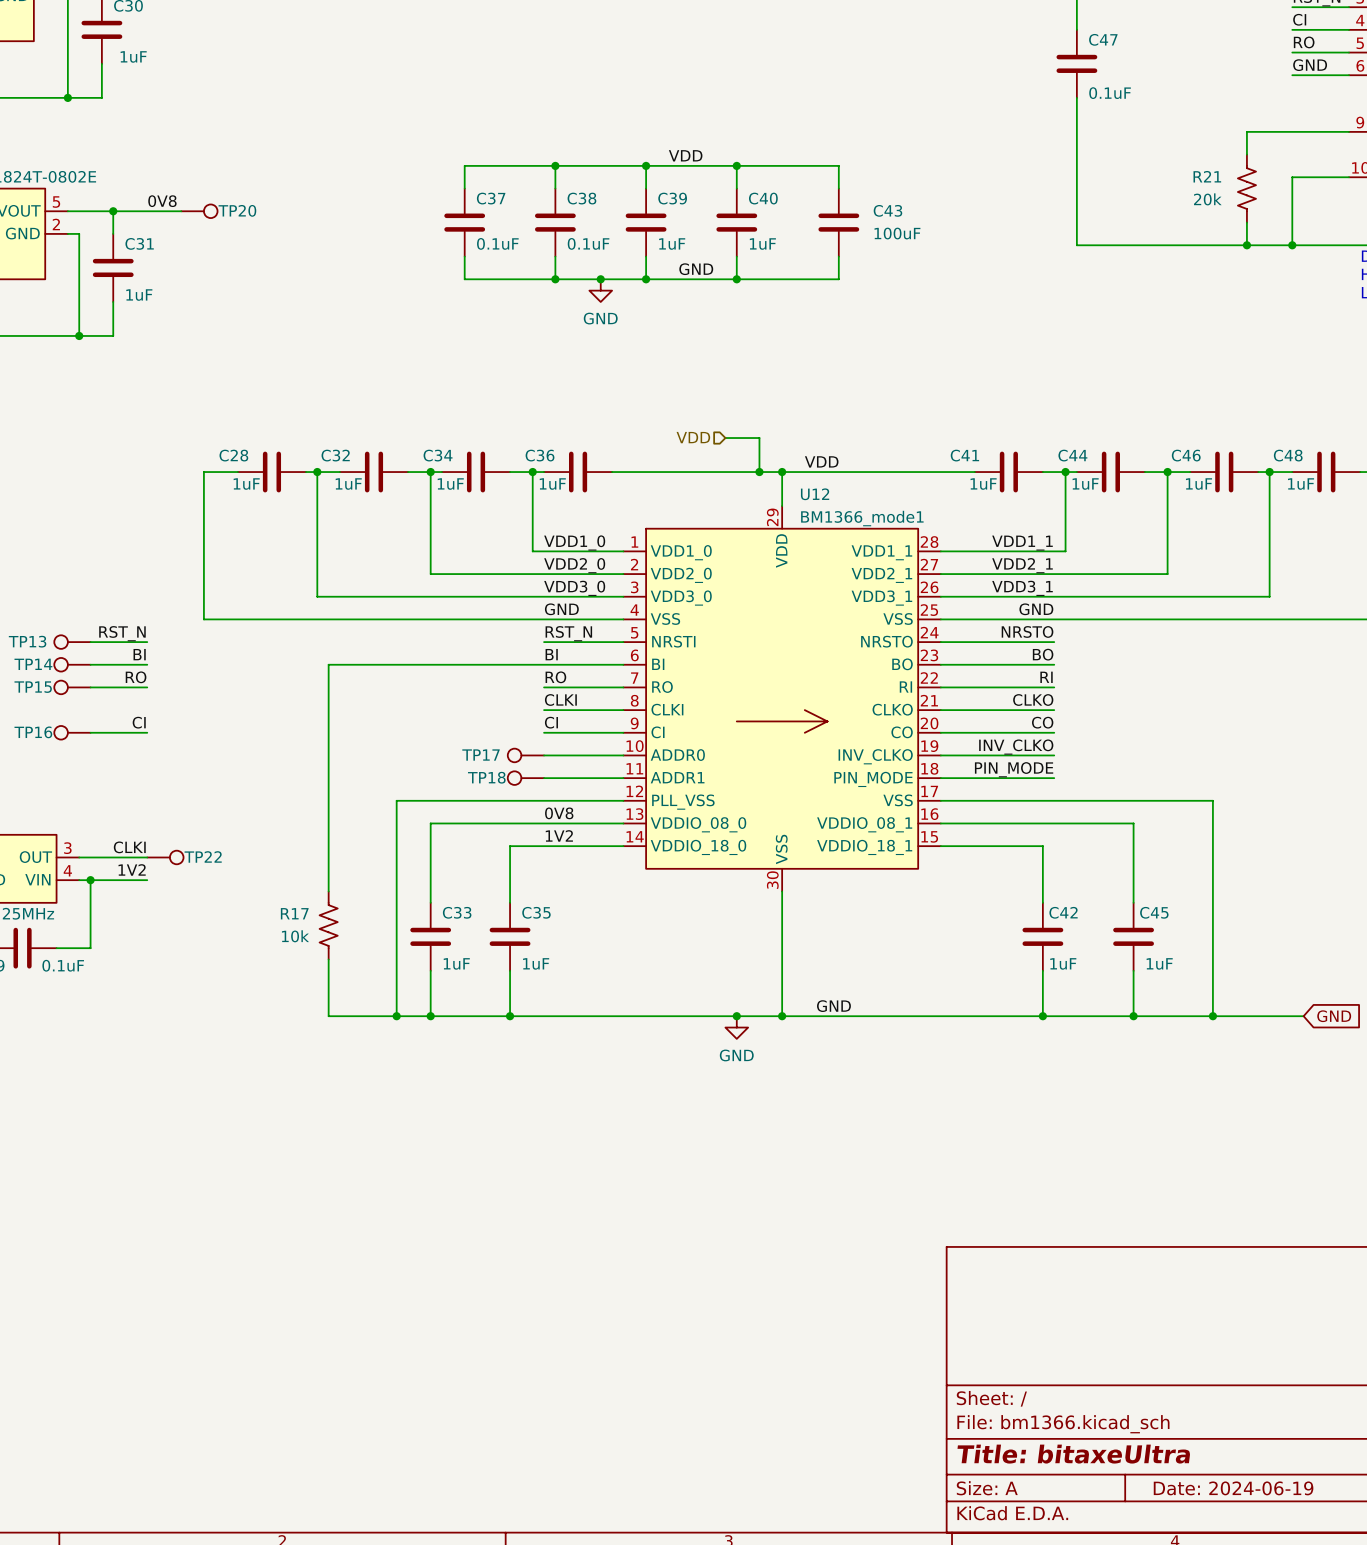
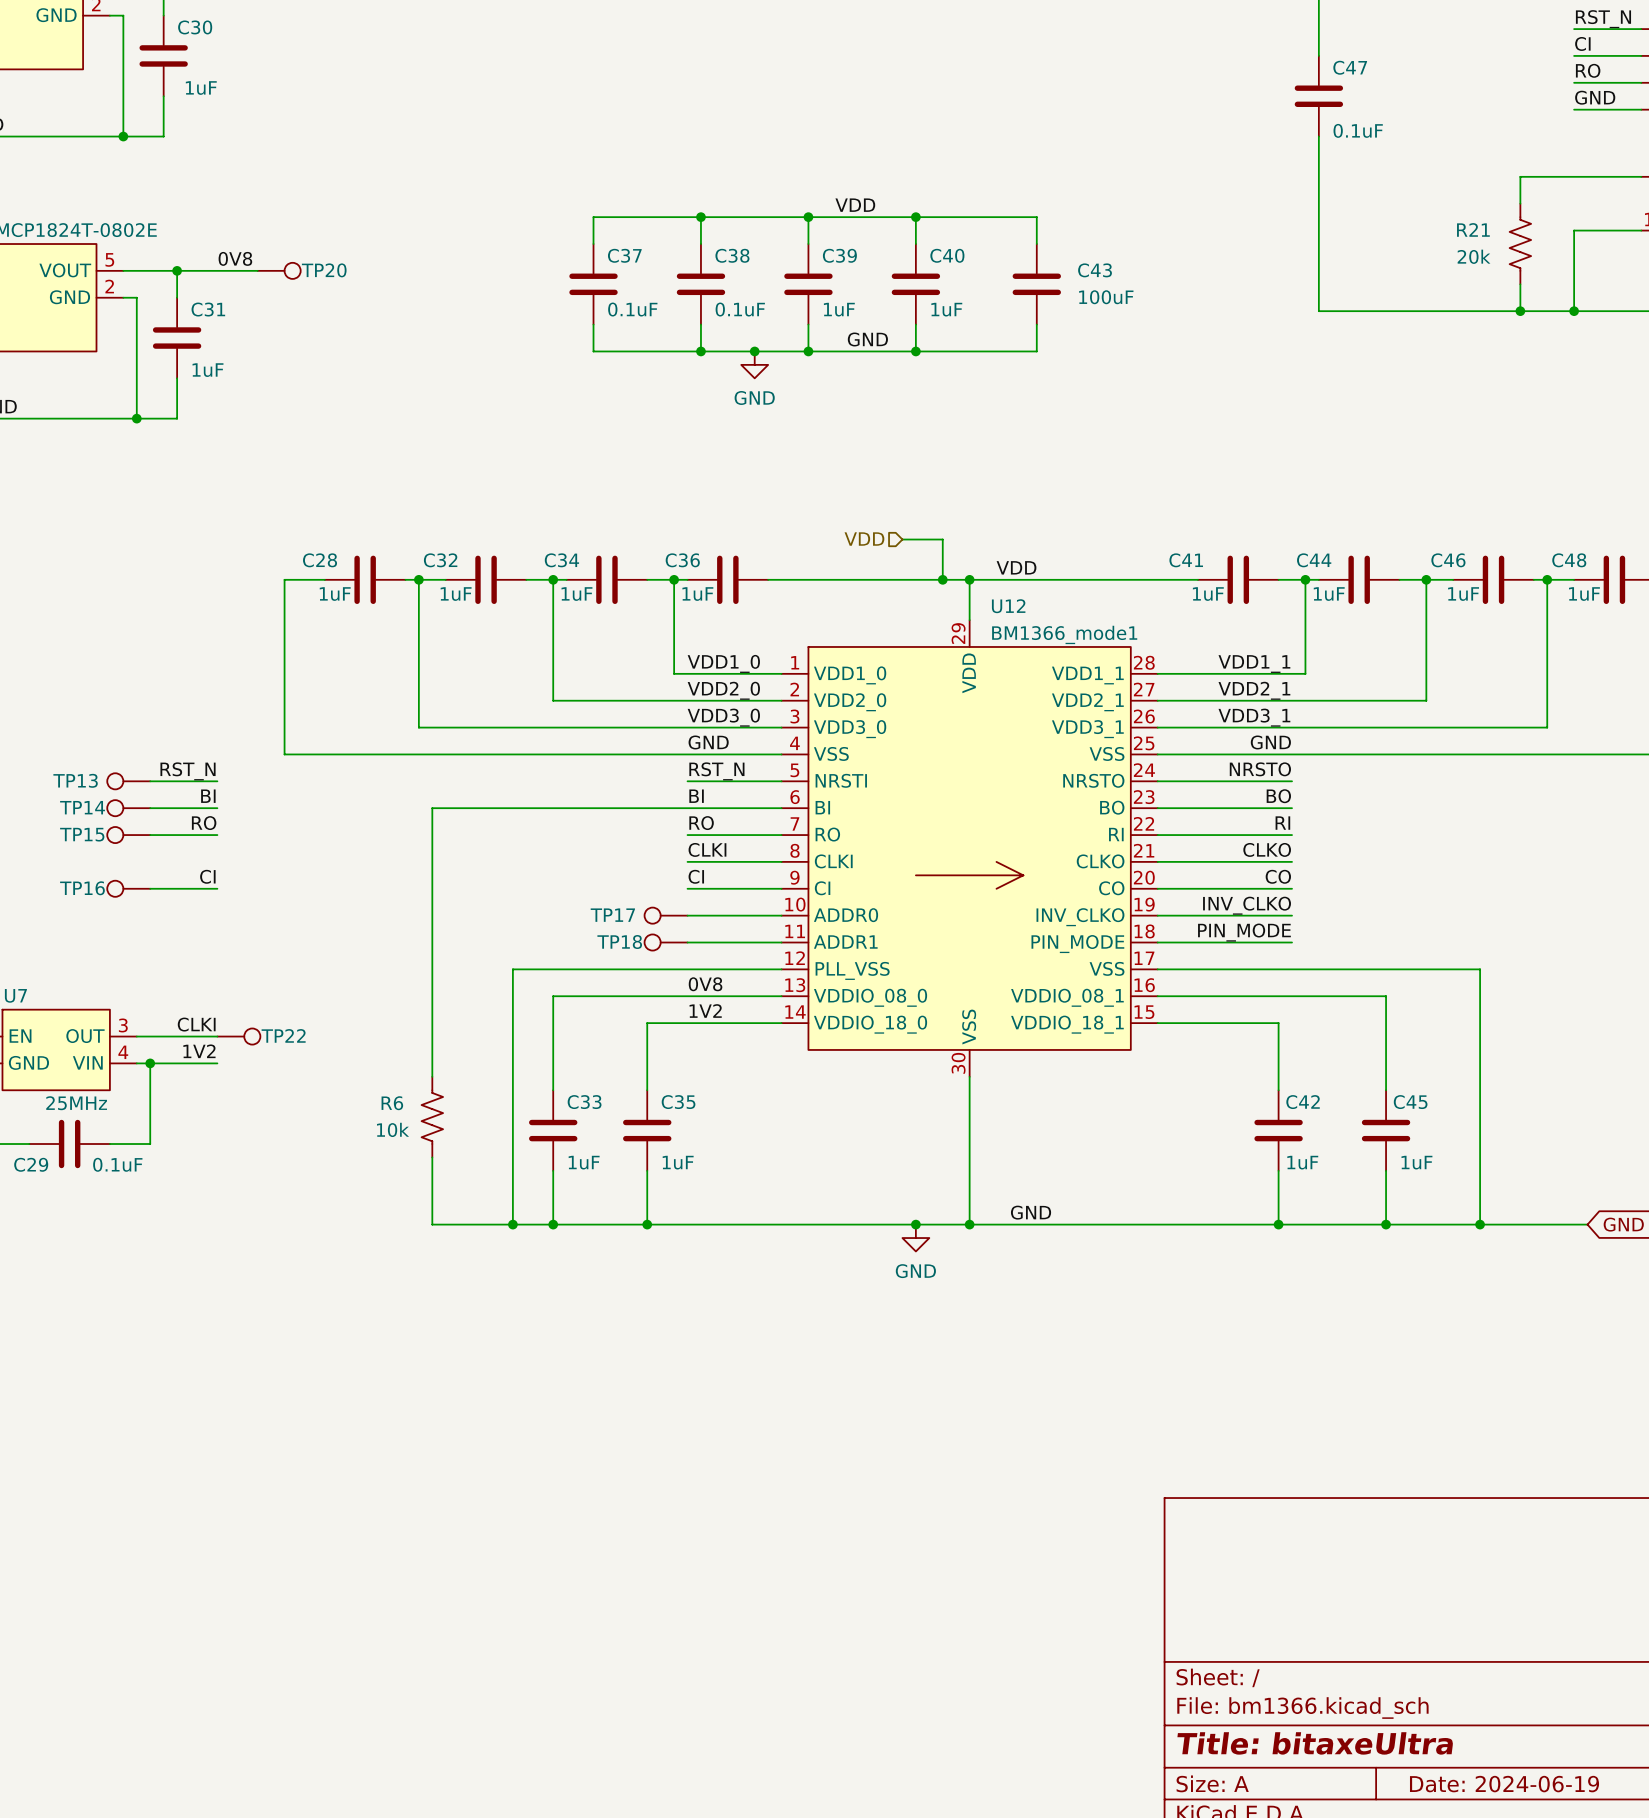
R17 name: R17 (294, 913) -> R6 (392, 1103)

